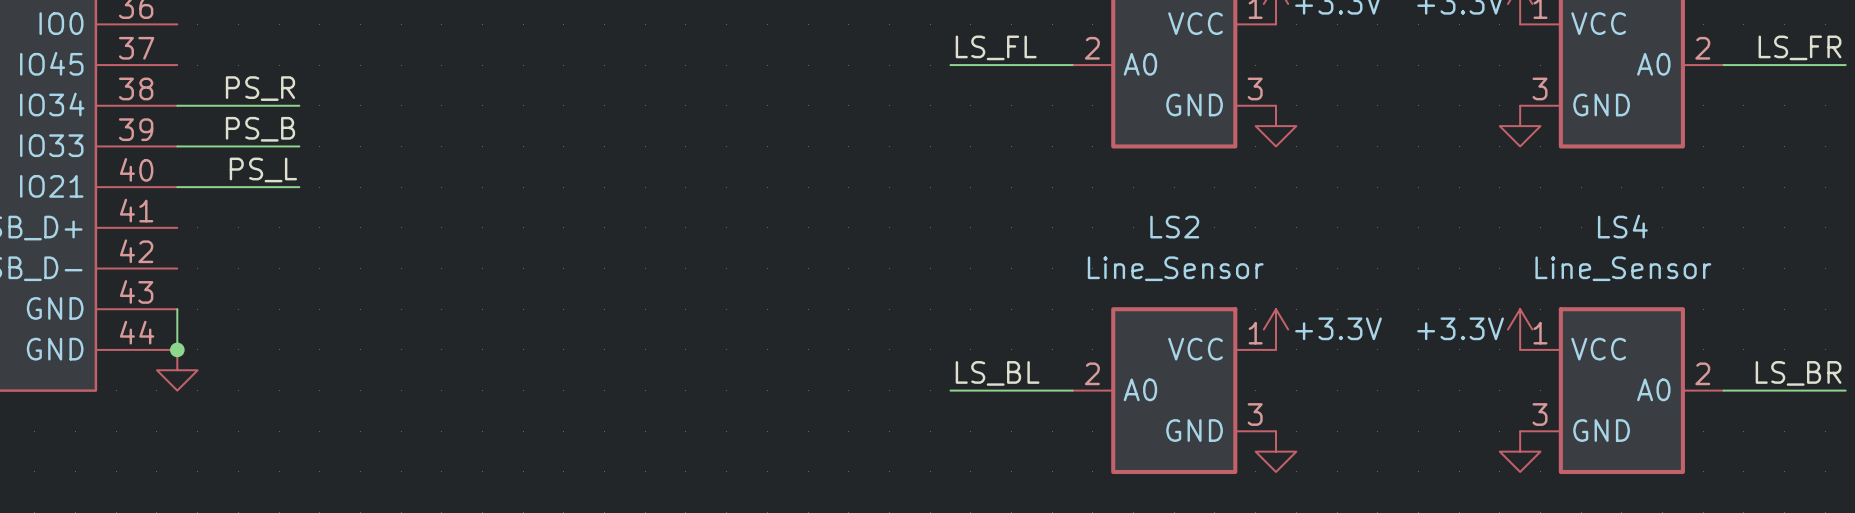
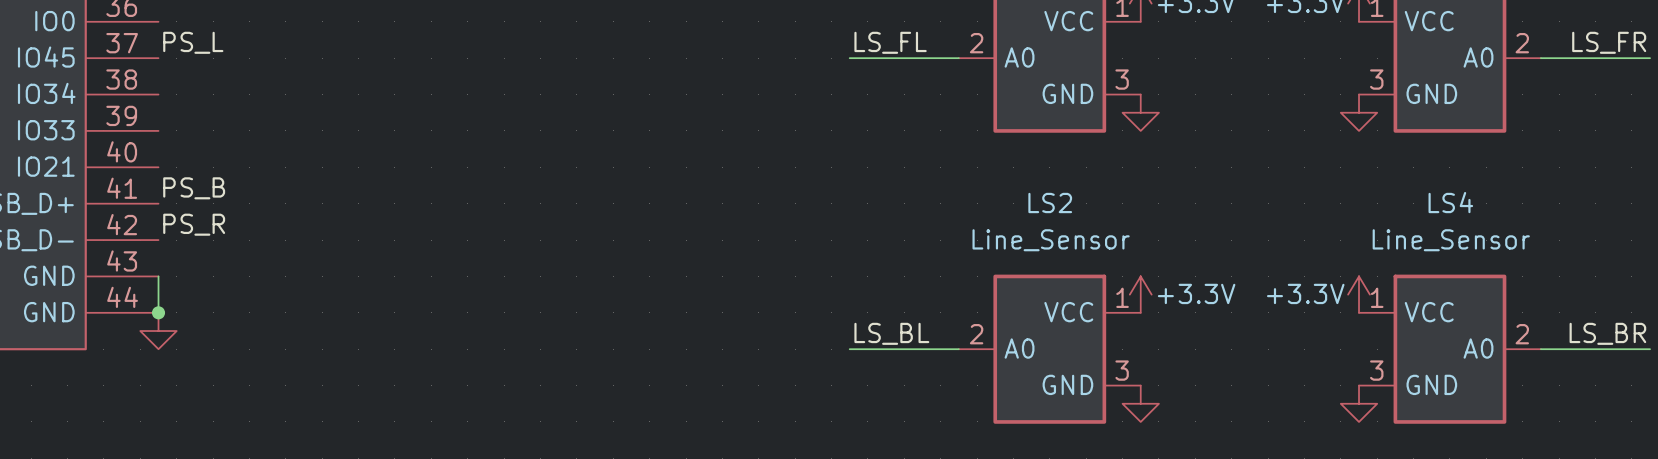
label position: PS_R (260, 88) -> PS_R (194, 224)
wire: (177, 105) (299, 105) -> none
label position: PS_B (260, 129) -> PS_B (194, 188)
wire: (177, 146) (299, 146) -> none
label position: PS_L (263, 169) -> PS_L (193, 42)
wire: (177, 187) (299, 187) -> none

